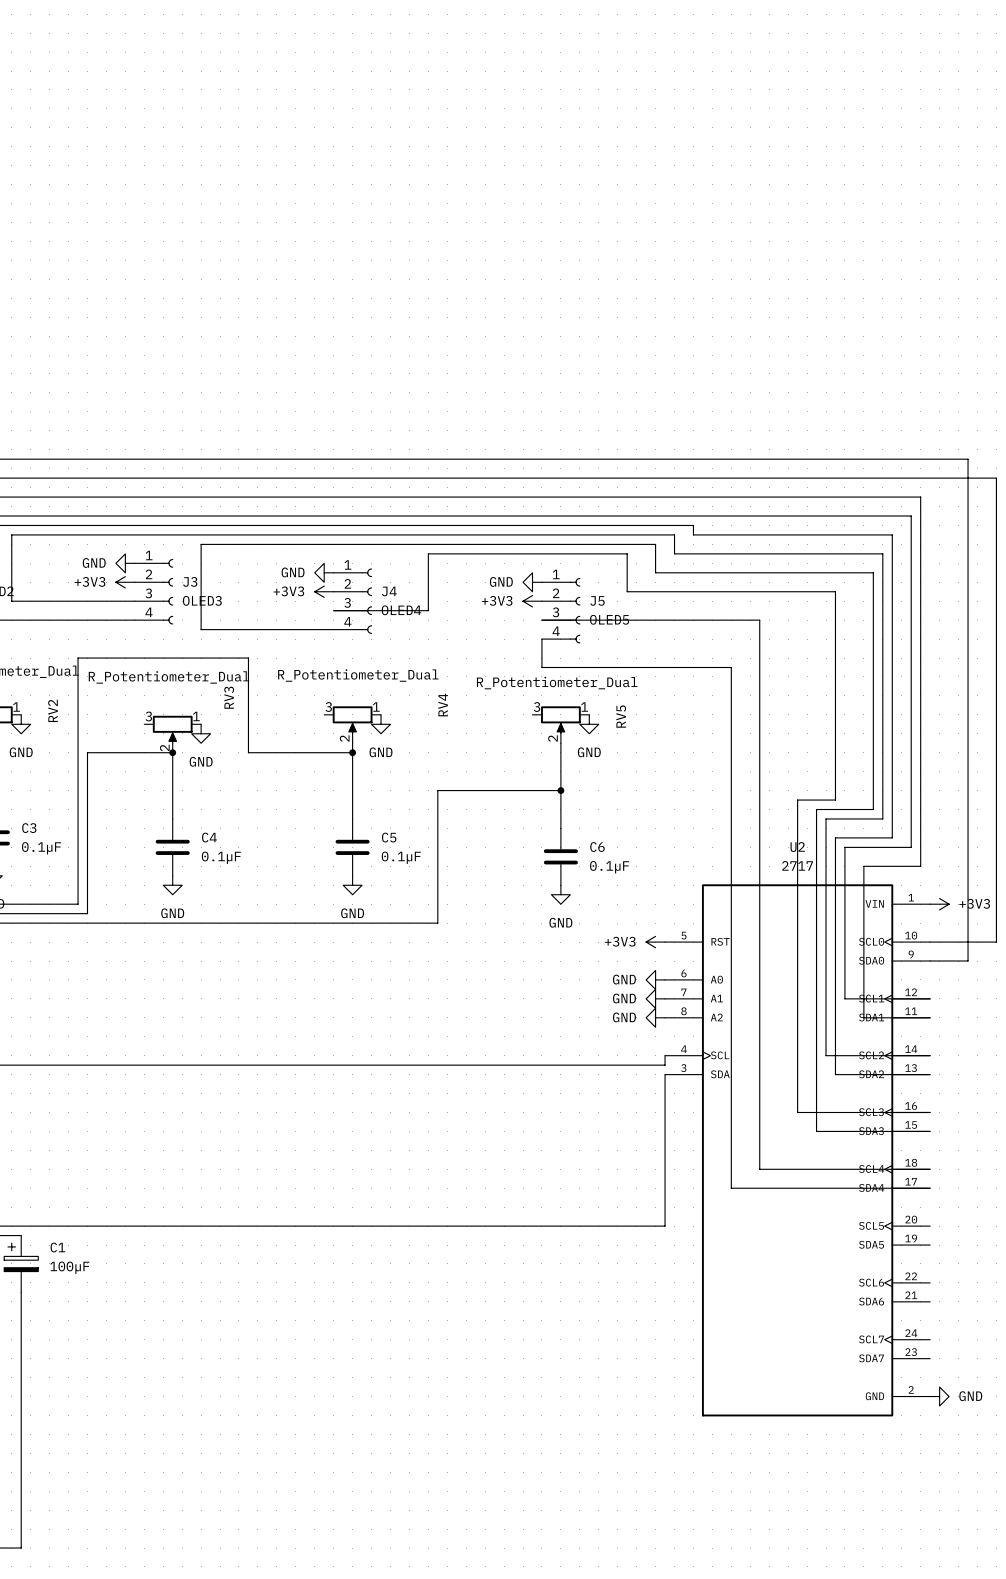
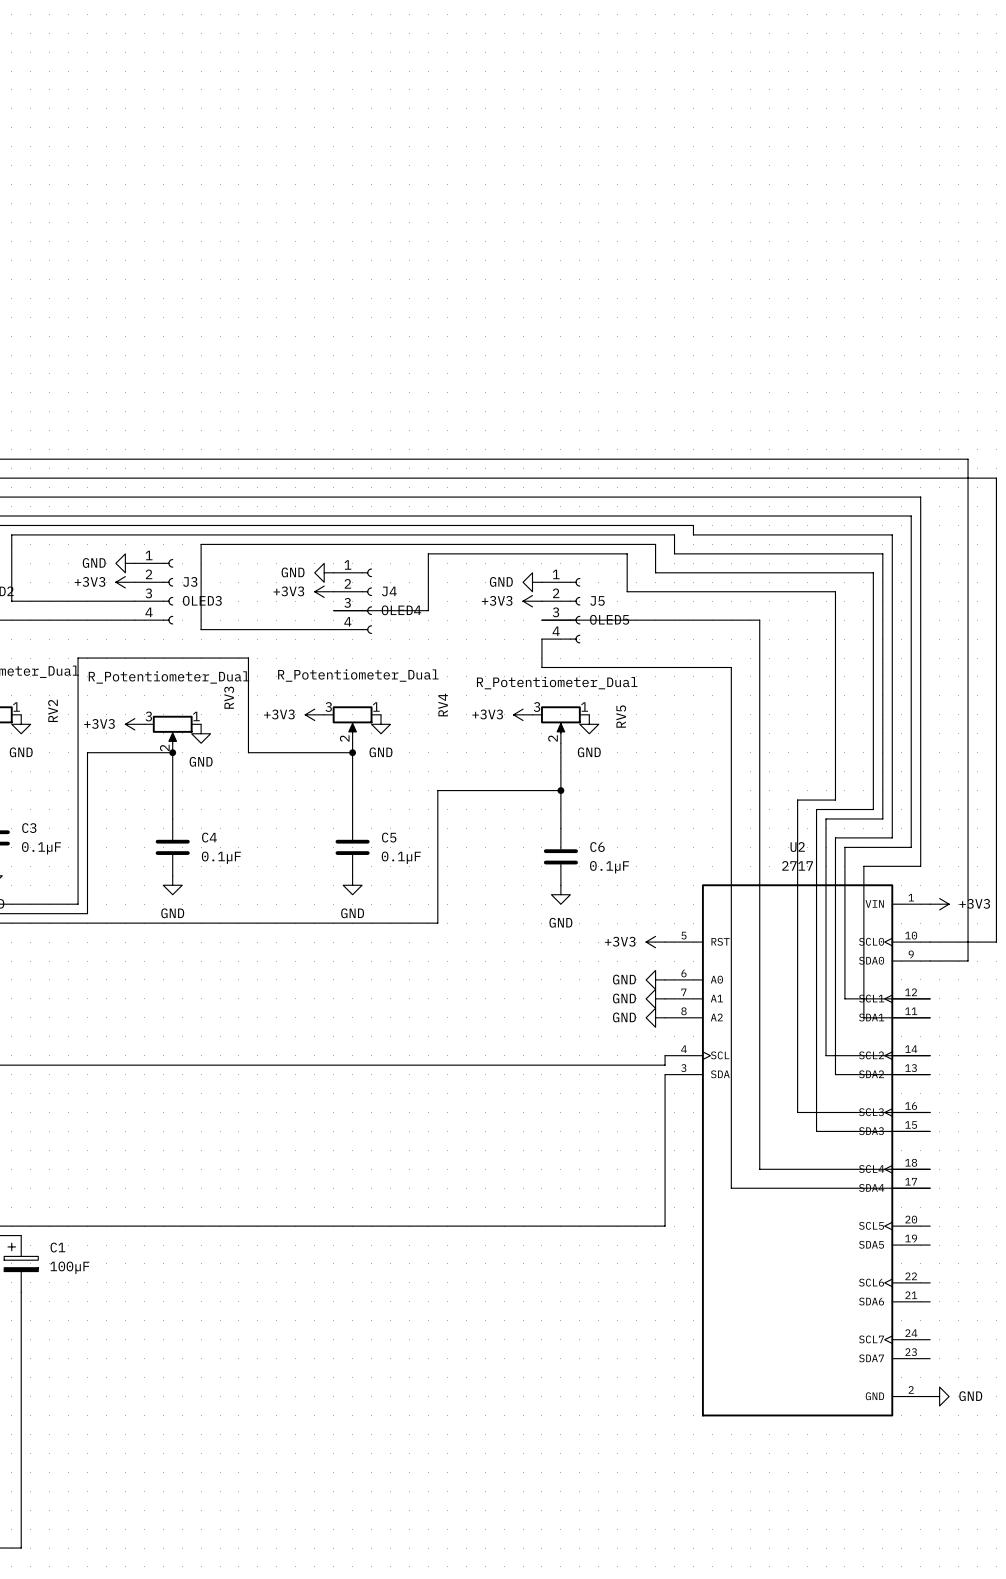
power symbol: none -> +3V3 (314, 714)
power symbol: none -> +3V3 (523, 714)
power symbol: none -> +3V3 (134, 724)

